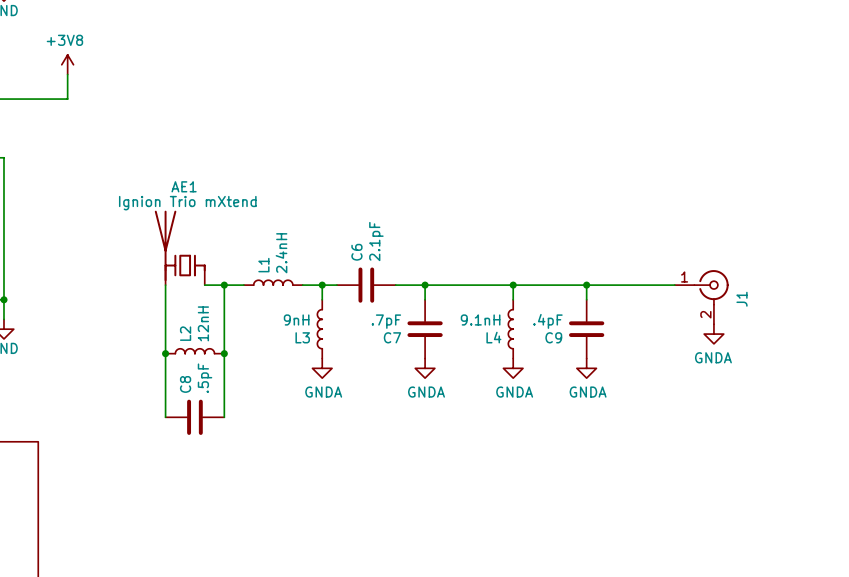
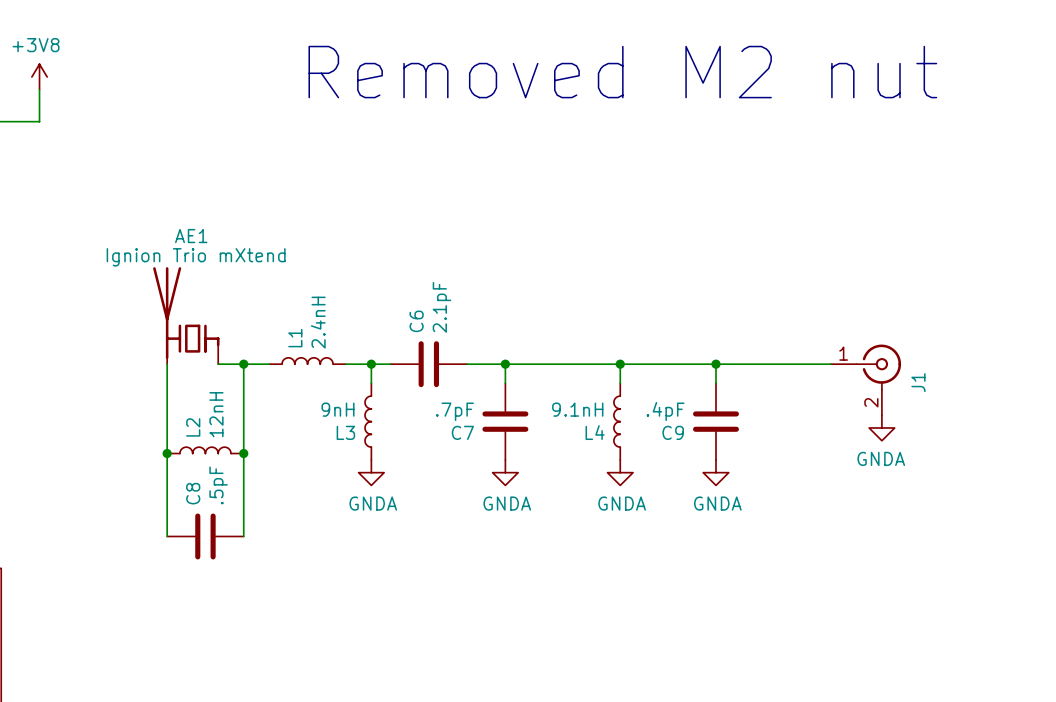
text: none -> Removed M2 nut (622, 72)

